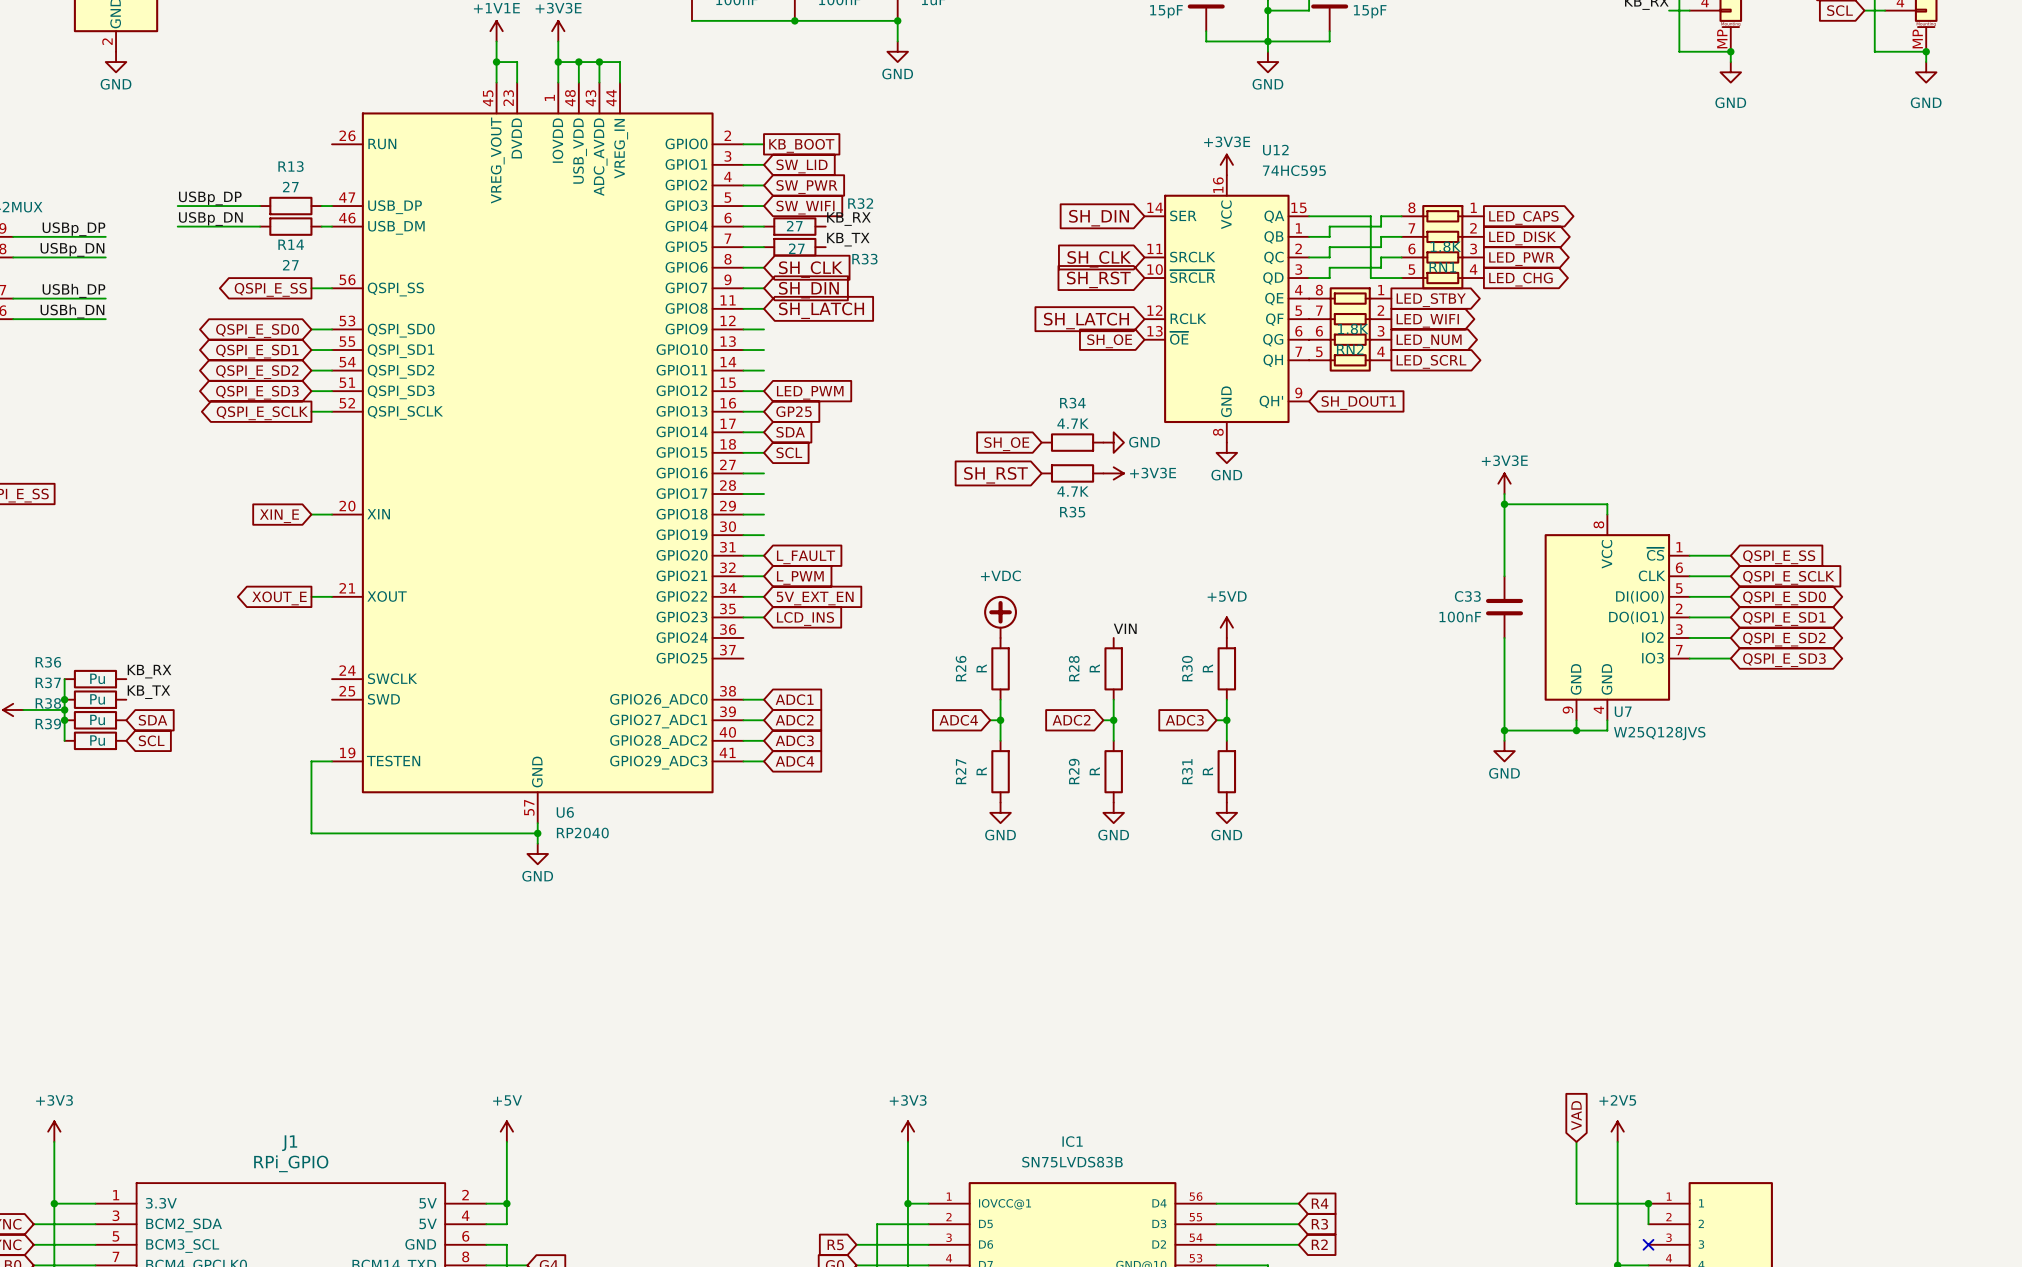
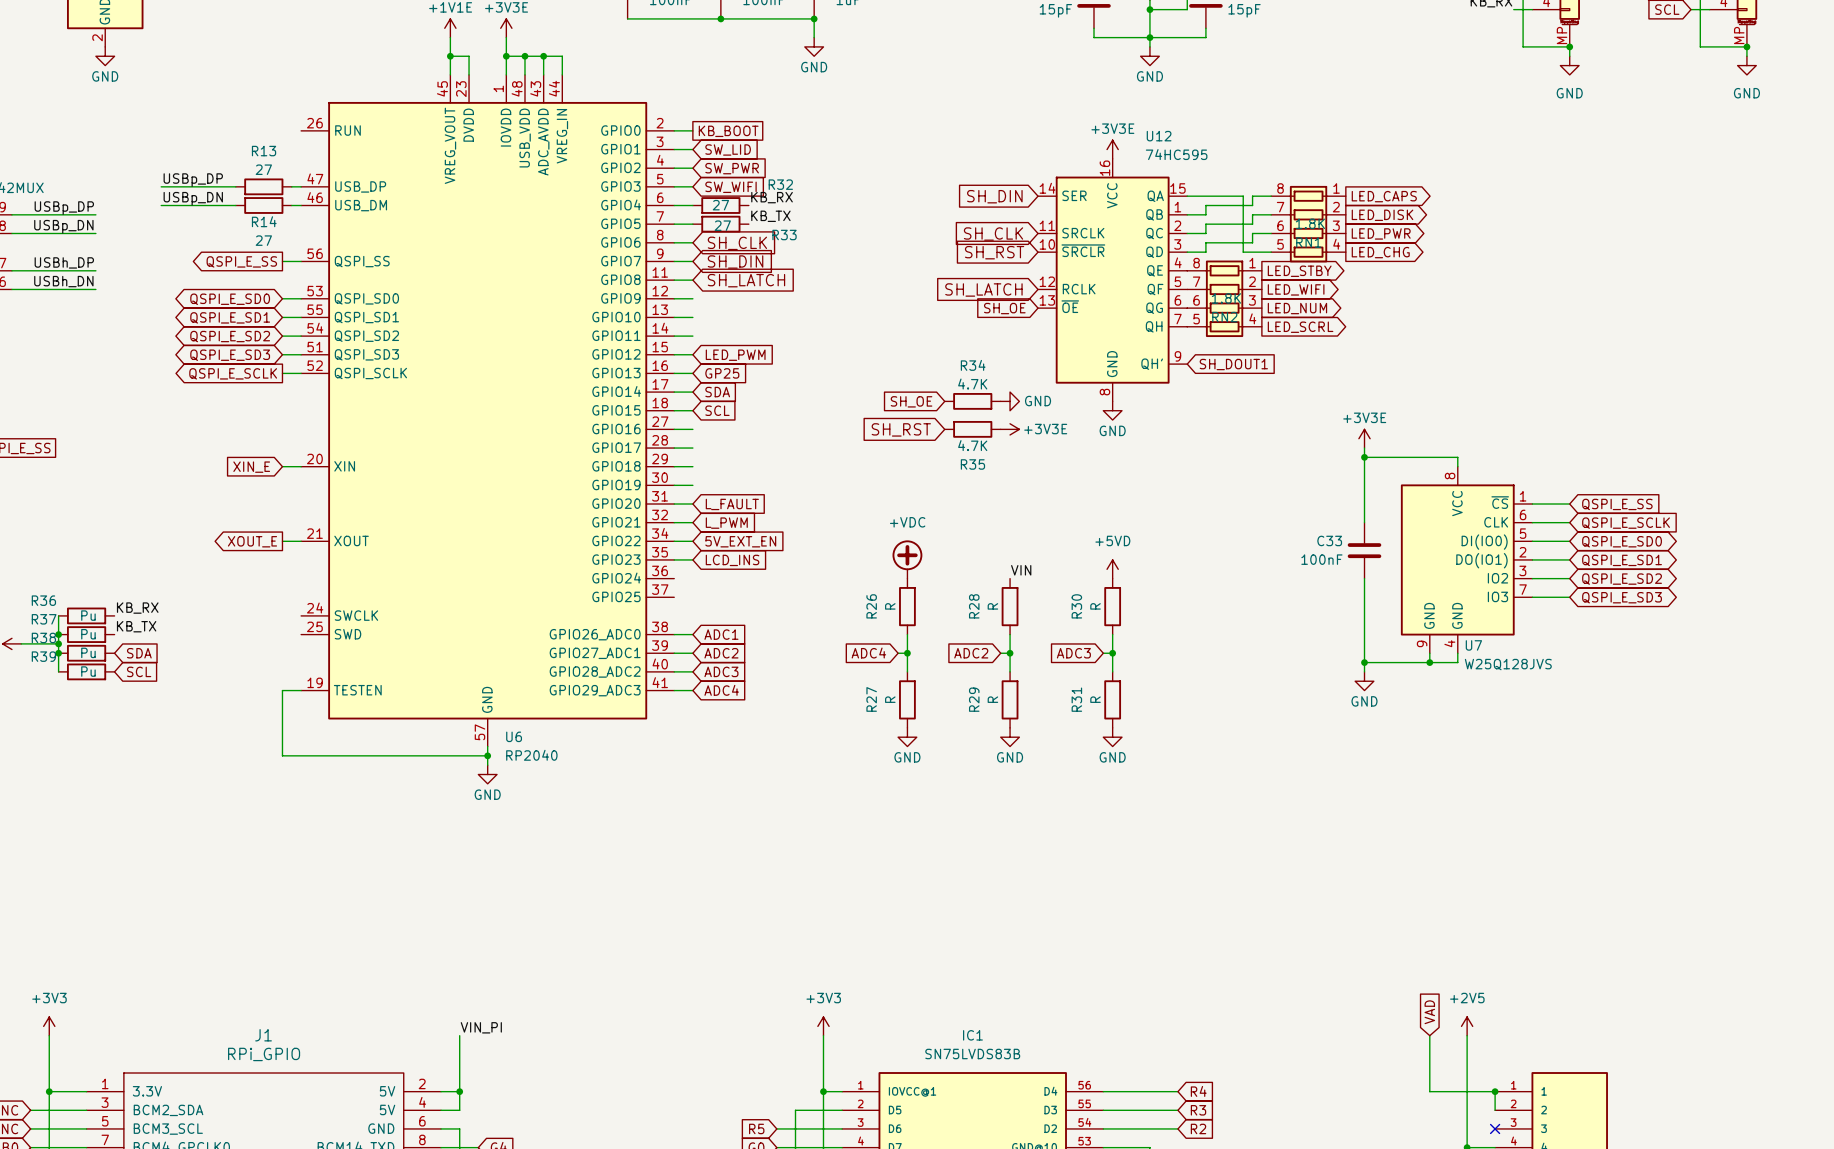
power symbol: +5V (506, 1131) -> none
label: none -> VIN_PI (481, 1027)

